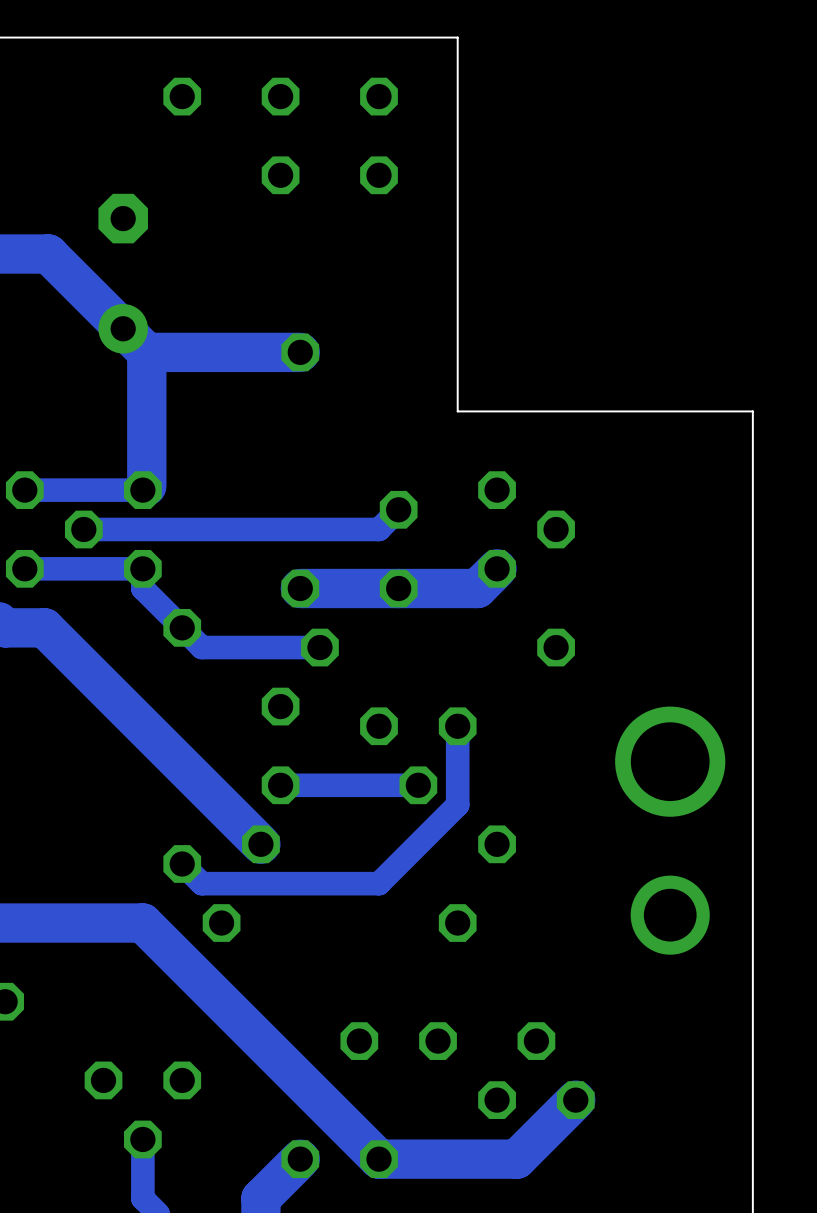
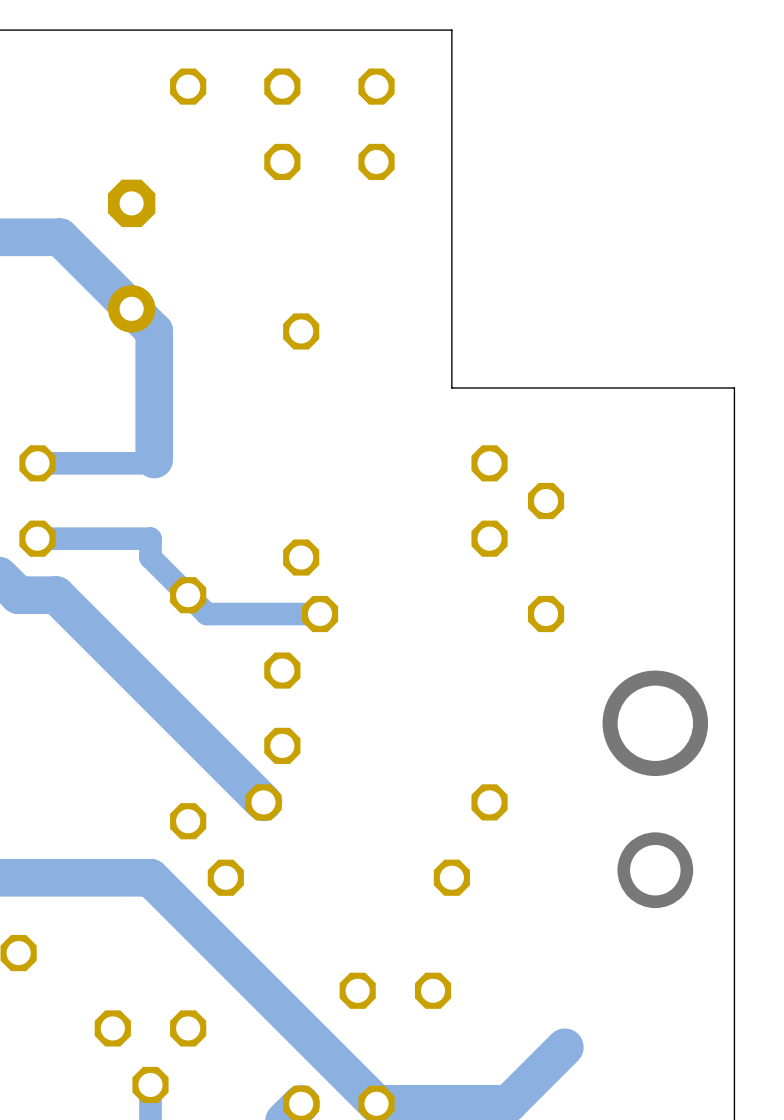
track: (300, 352) (146, 352) -> none
track: (398, 509) (379, 529) (83, 529) -> none
part: (113, 529) -> none
part: (398, 549) -> none
track: (497, 568) (477, 588) (300, 588) -> none
track: (457, 726) (457, 804) (379, 883) (201, 883) (182, 863) -> none
part: (418, 755) -> none
track: (418, 785) (280, 785) -> none
part: (536, 1070) -> none

